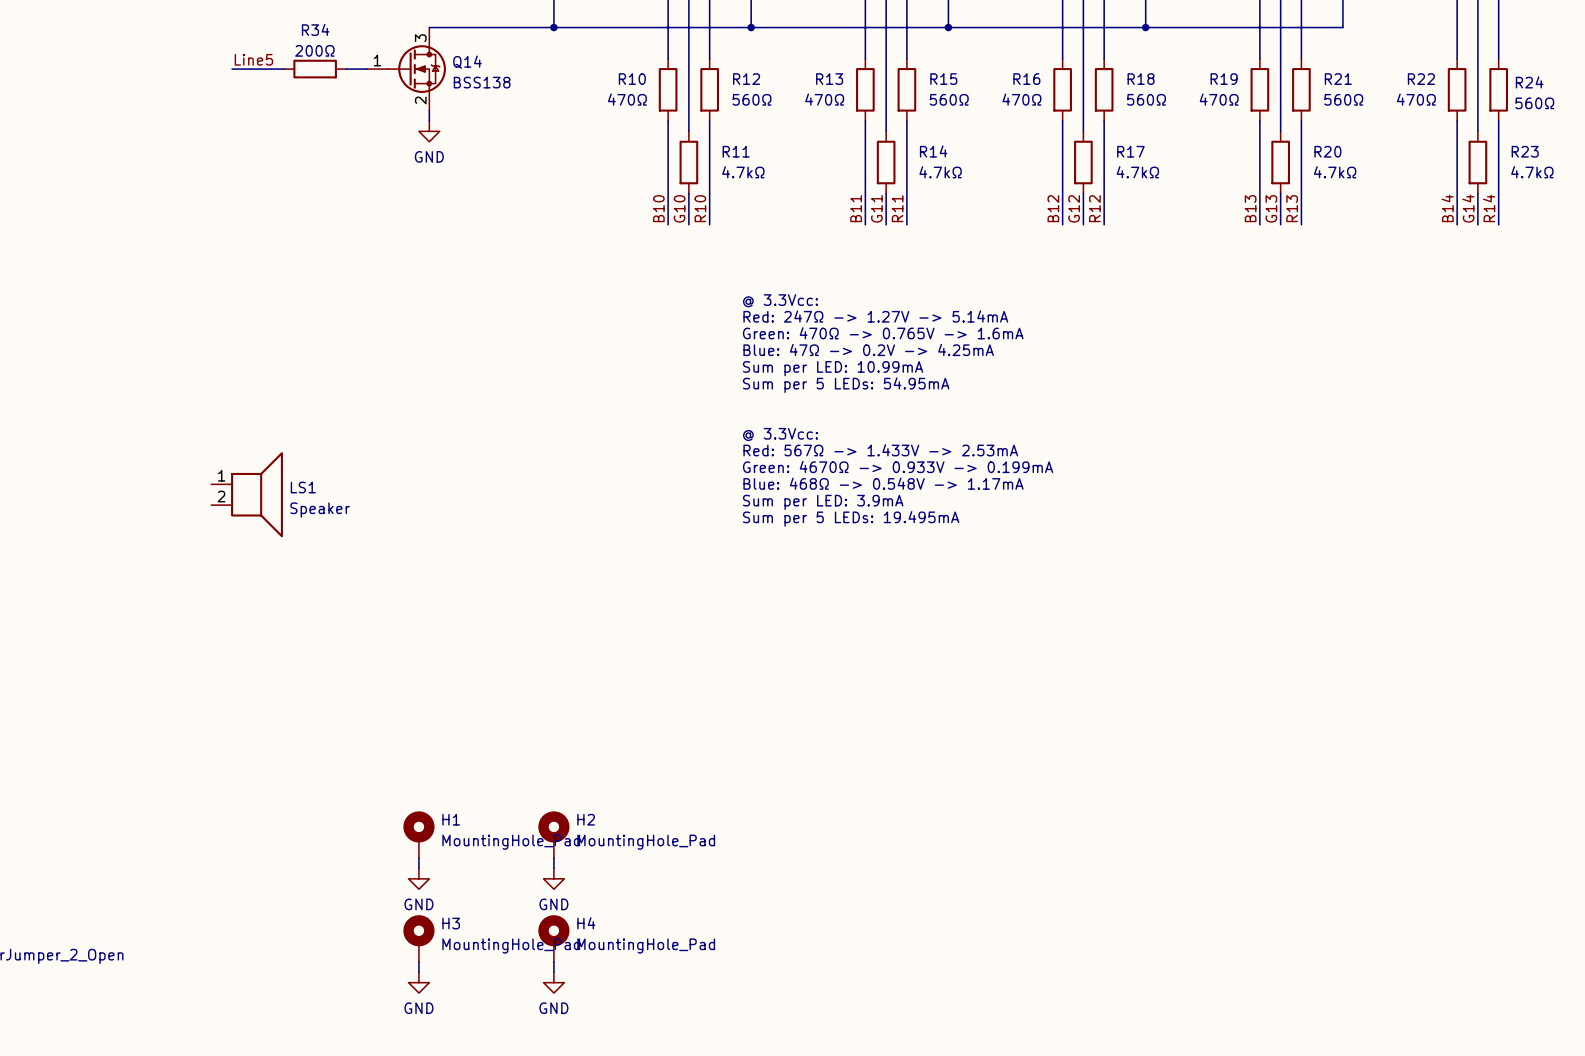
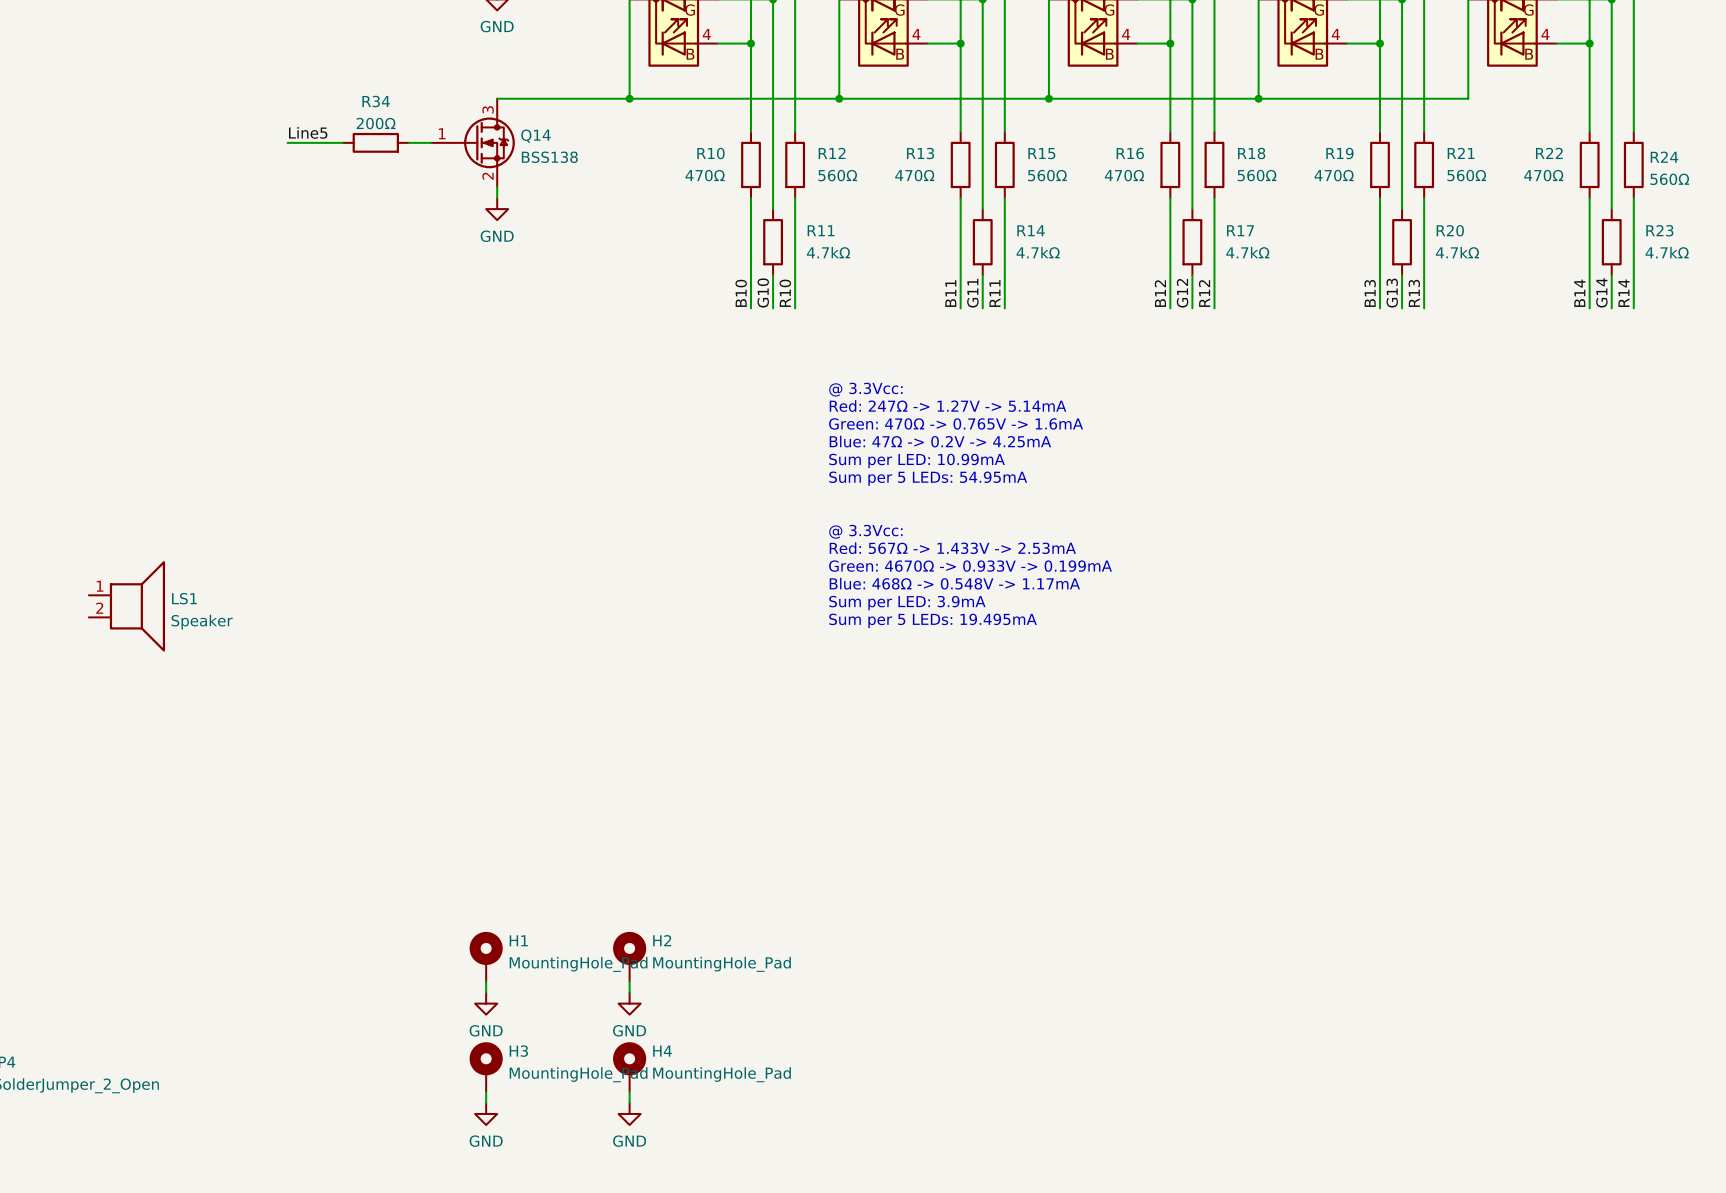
LS1 position: (247, 494) -> (126, 606)

